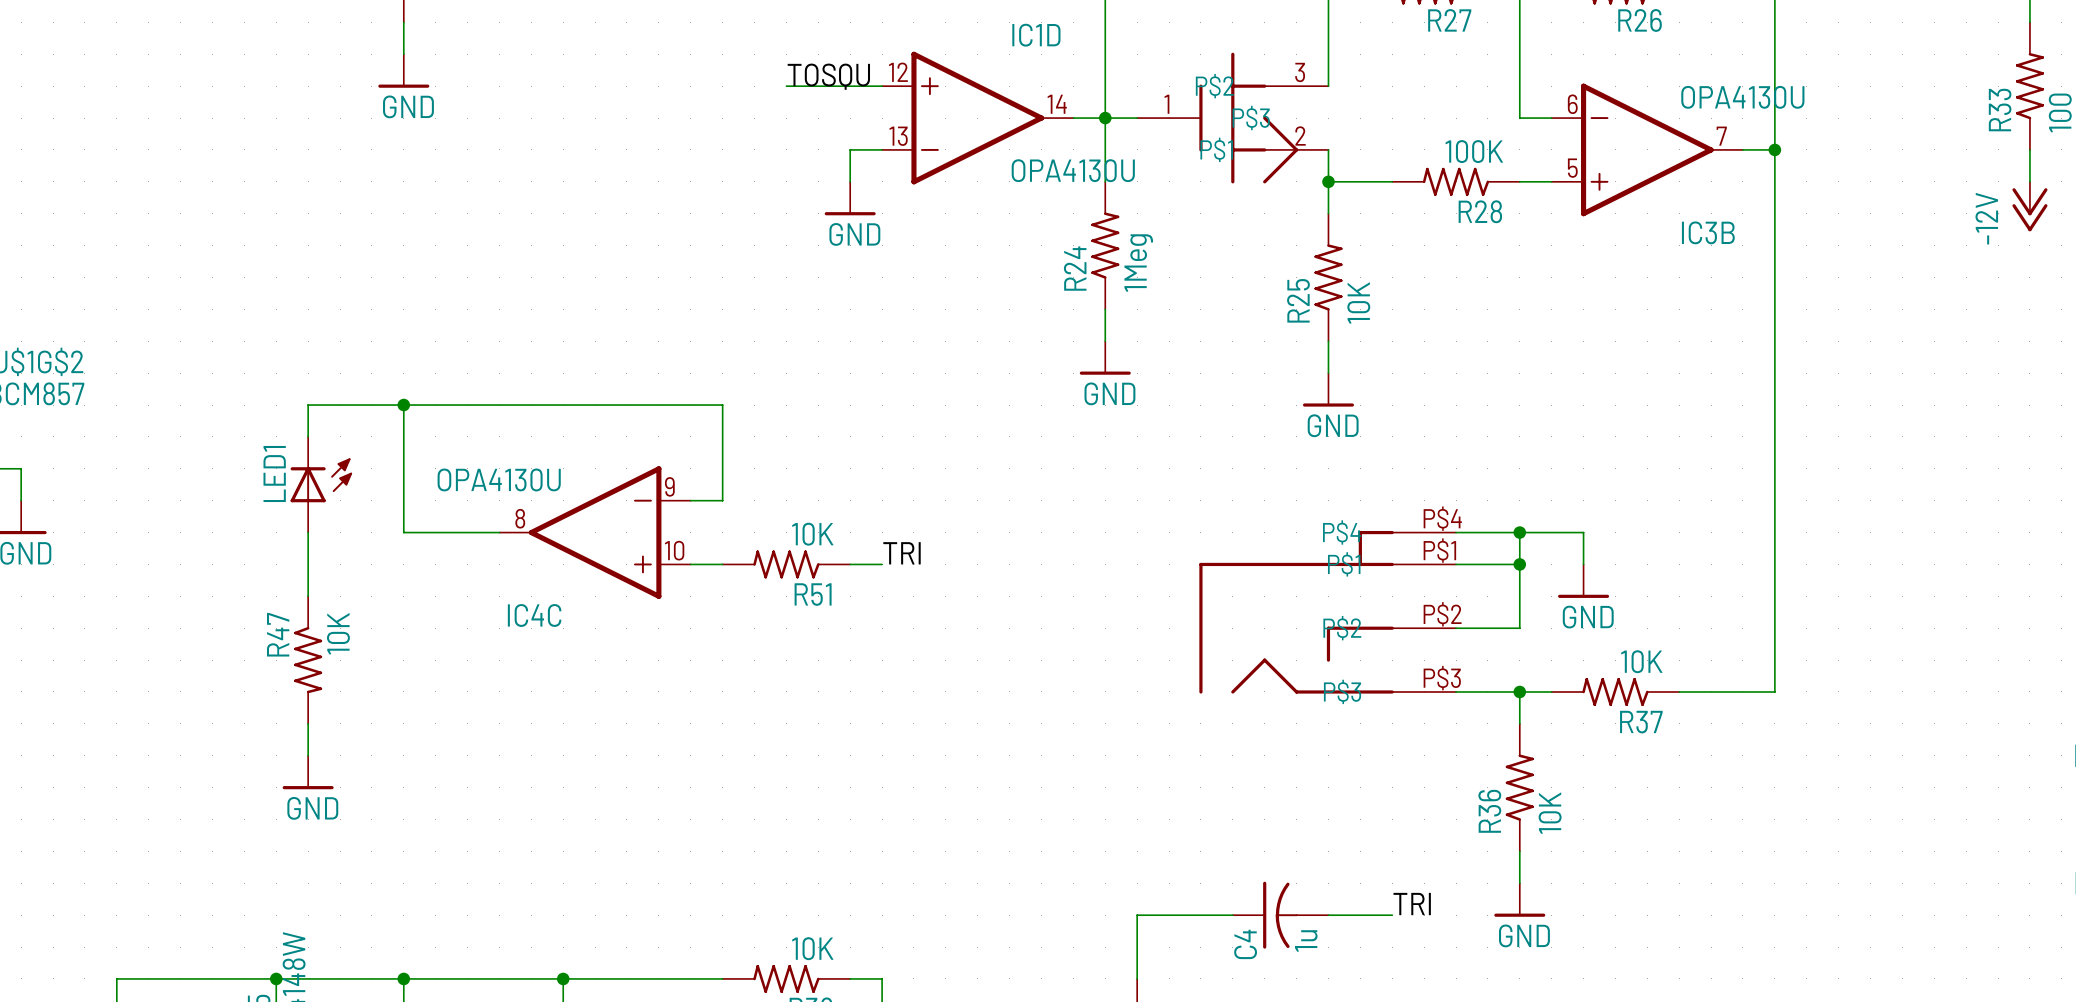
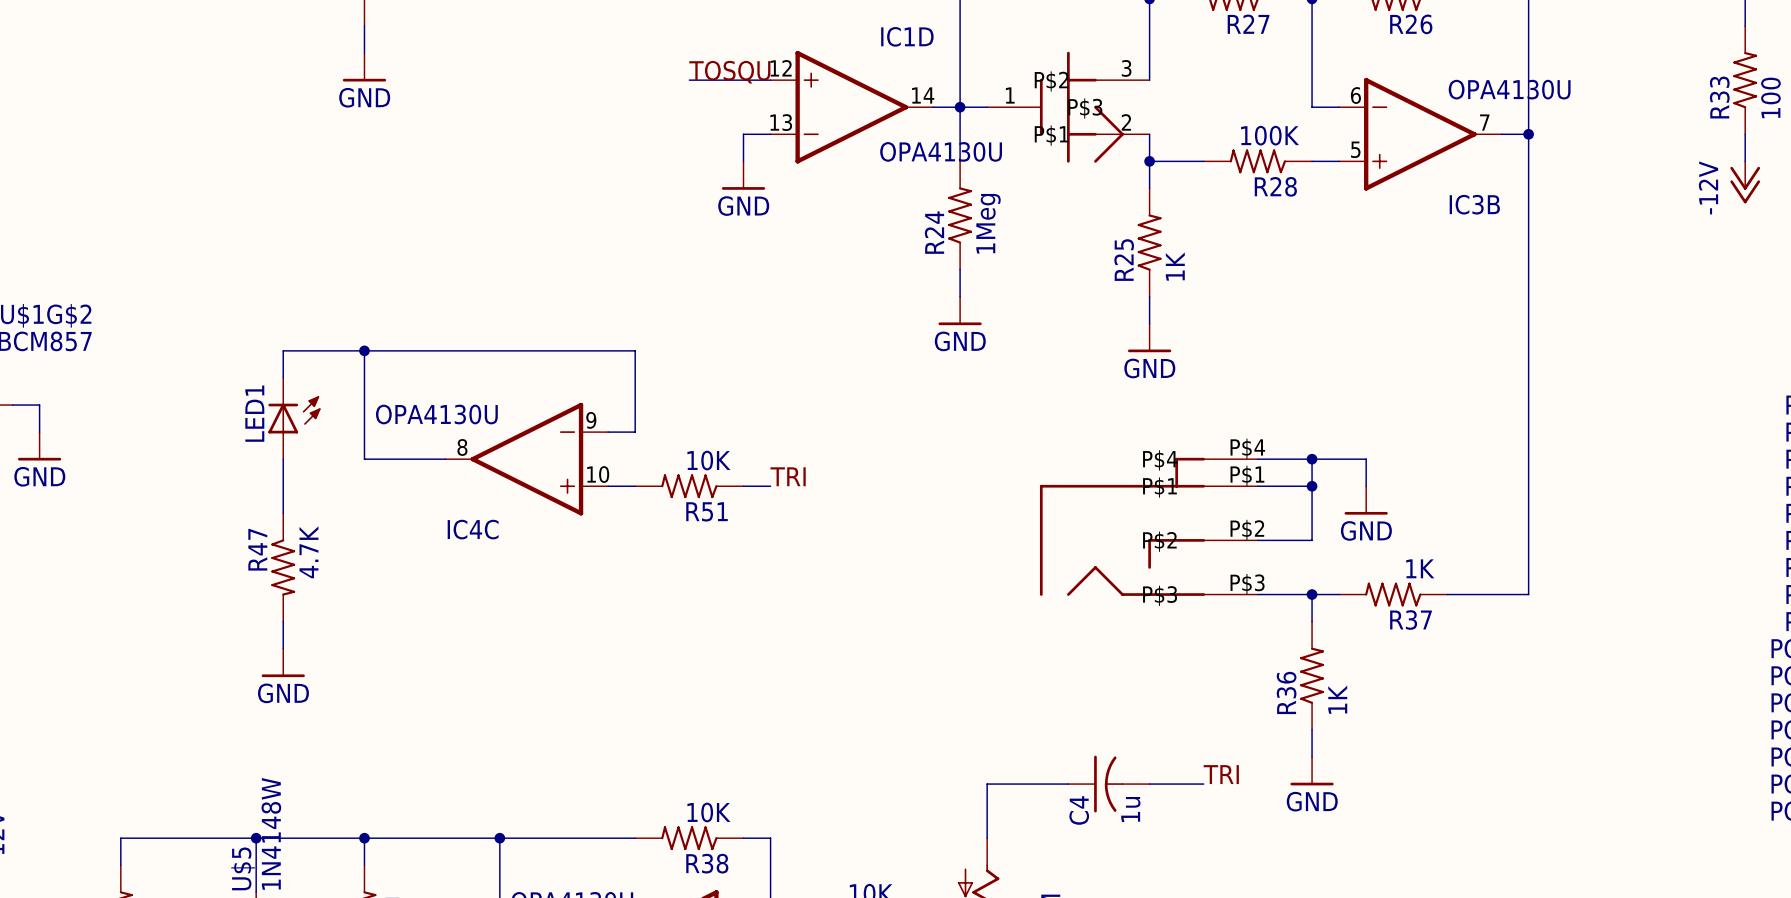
R25 value: 10K (1358, 302) -> 1K (1175, 266)
R47 value: 10K (338, 633) -> 4.7K (308, 552)
R37 value: 10K (1641, 661) -> 1K (1420, 568)
R36 value: 10K (1550, 813) -> 1K (1337, 699)

